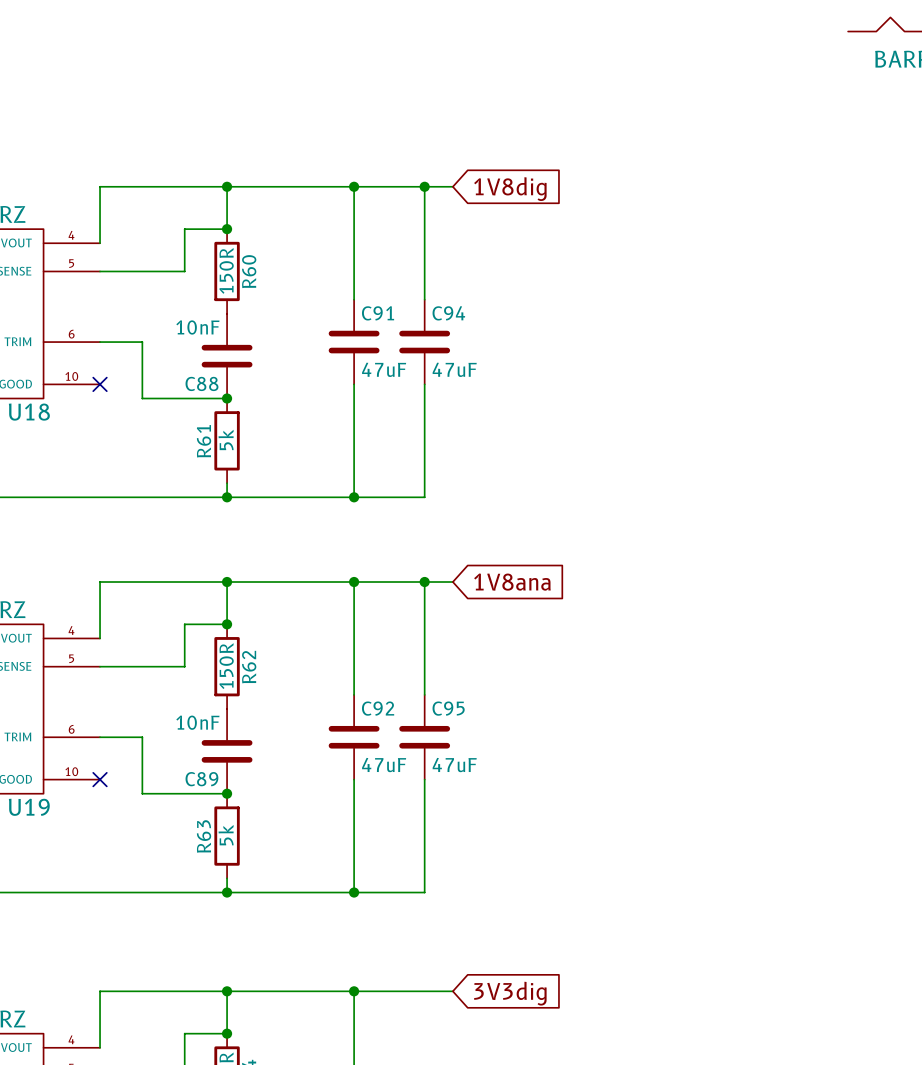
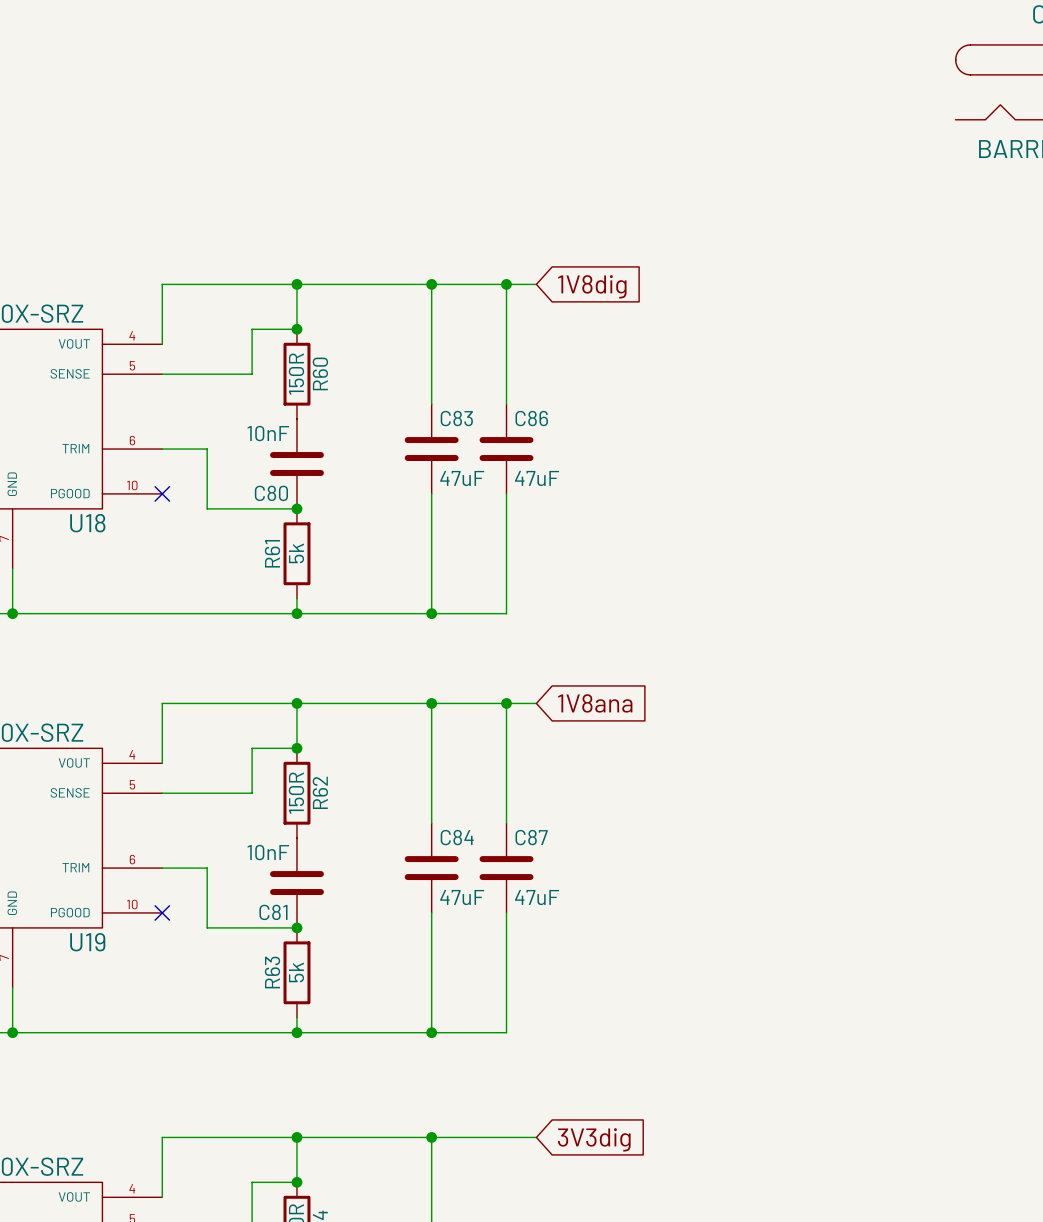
C91 name: C91 (378, 313) -> C83 (456, 418)
C94 name: C94 (448, 313) -> C86 (531, 418)
C88 name: C88 (201, 383) -> C80 (271, 493)
C92 name: C92 (378, 708) -> C84 (457, 837)
C95 name: C95 (448, 708) -> C87 (531, 837)
C89 name: C89 (201, 779) -> C81 (273, 912)

